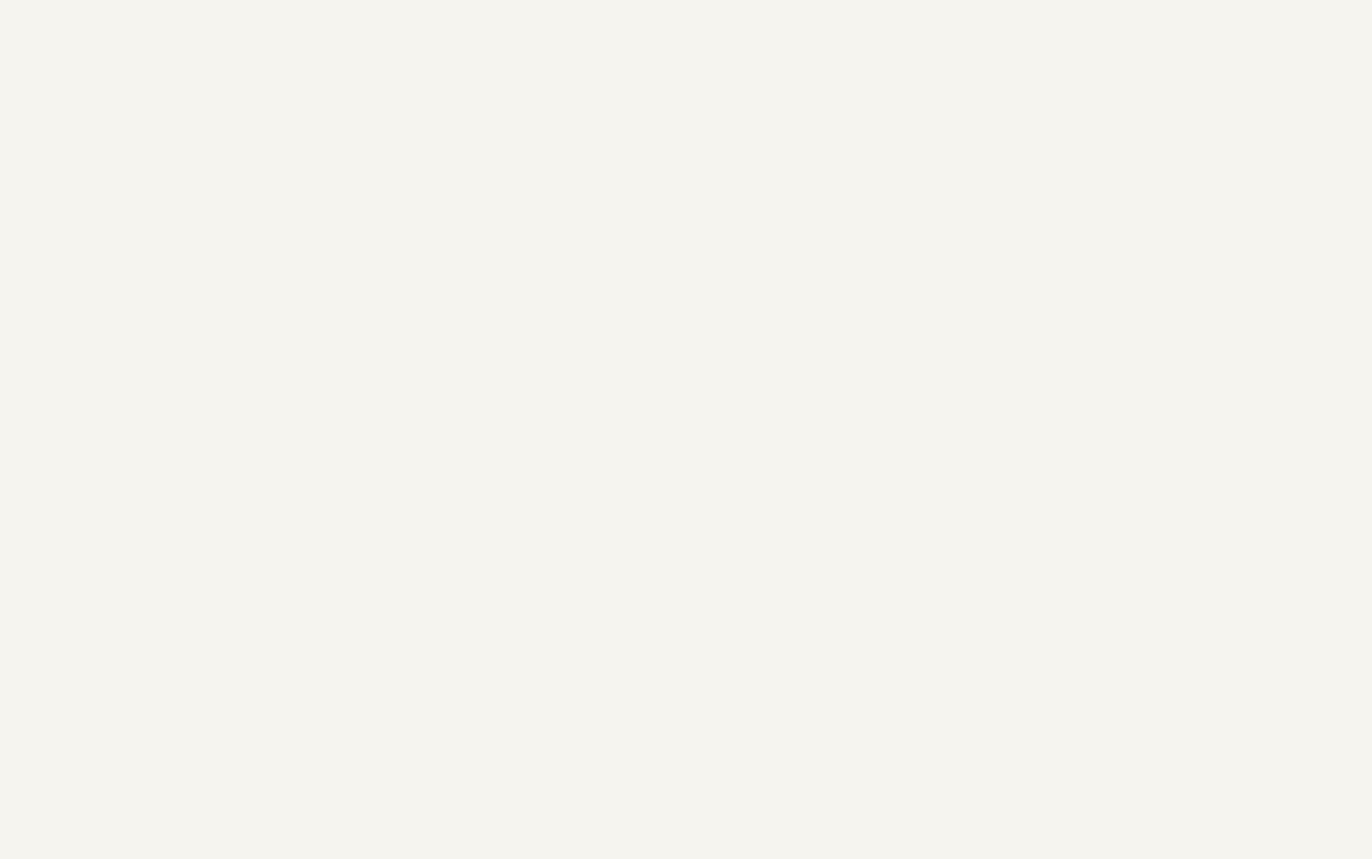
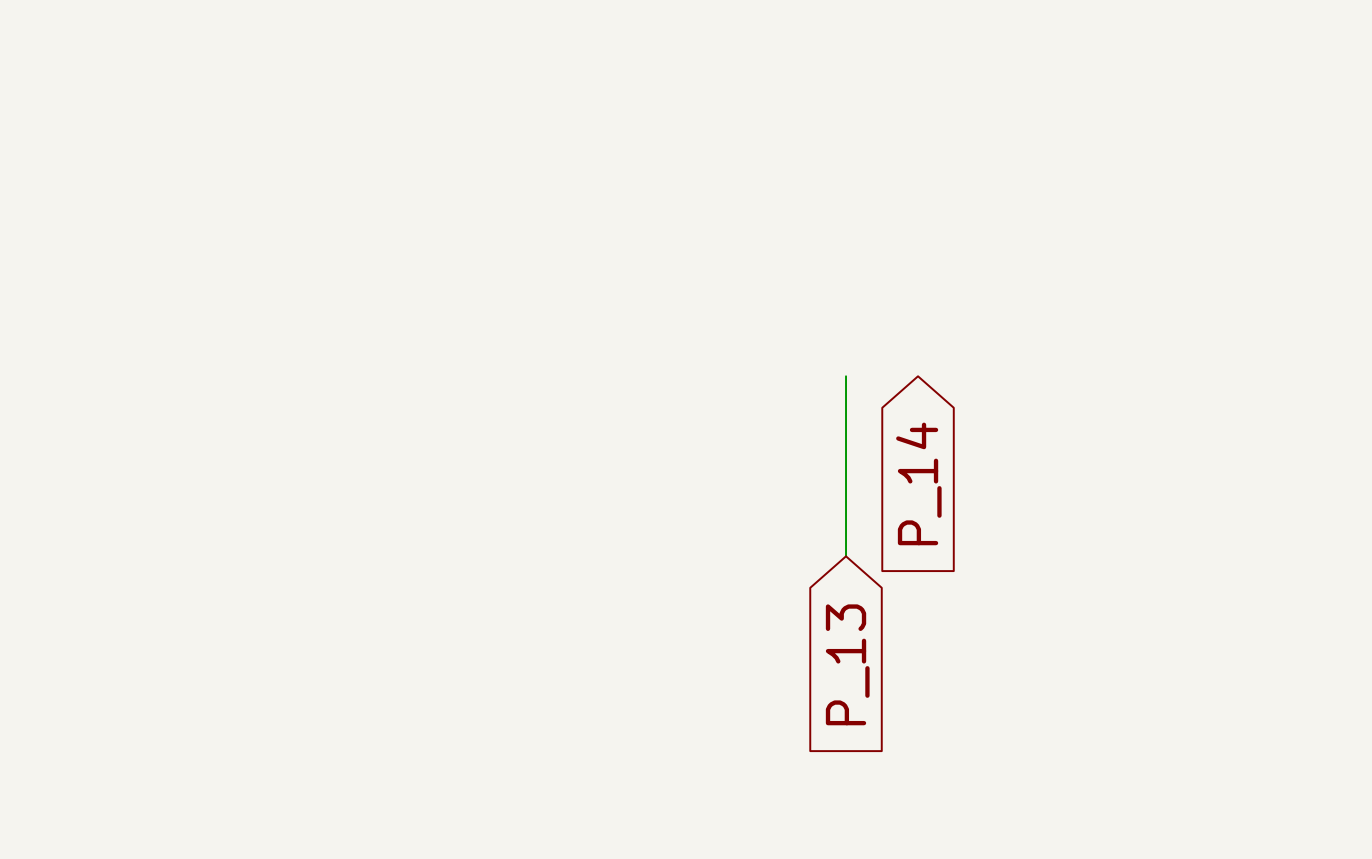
wire: none -> (846, 376) (846, 556)
global label: none -> P_14 (918, 483)
global label: none -> P_13 (847, 664)

